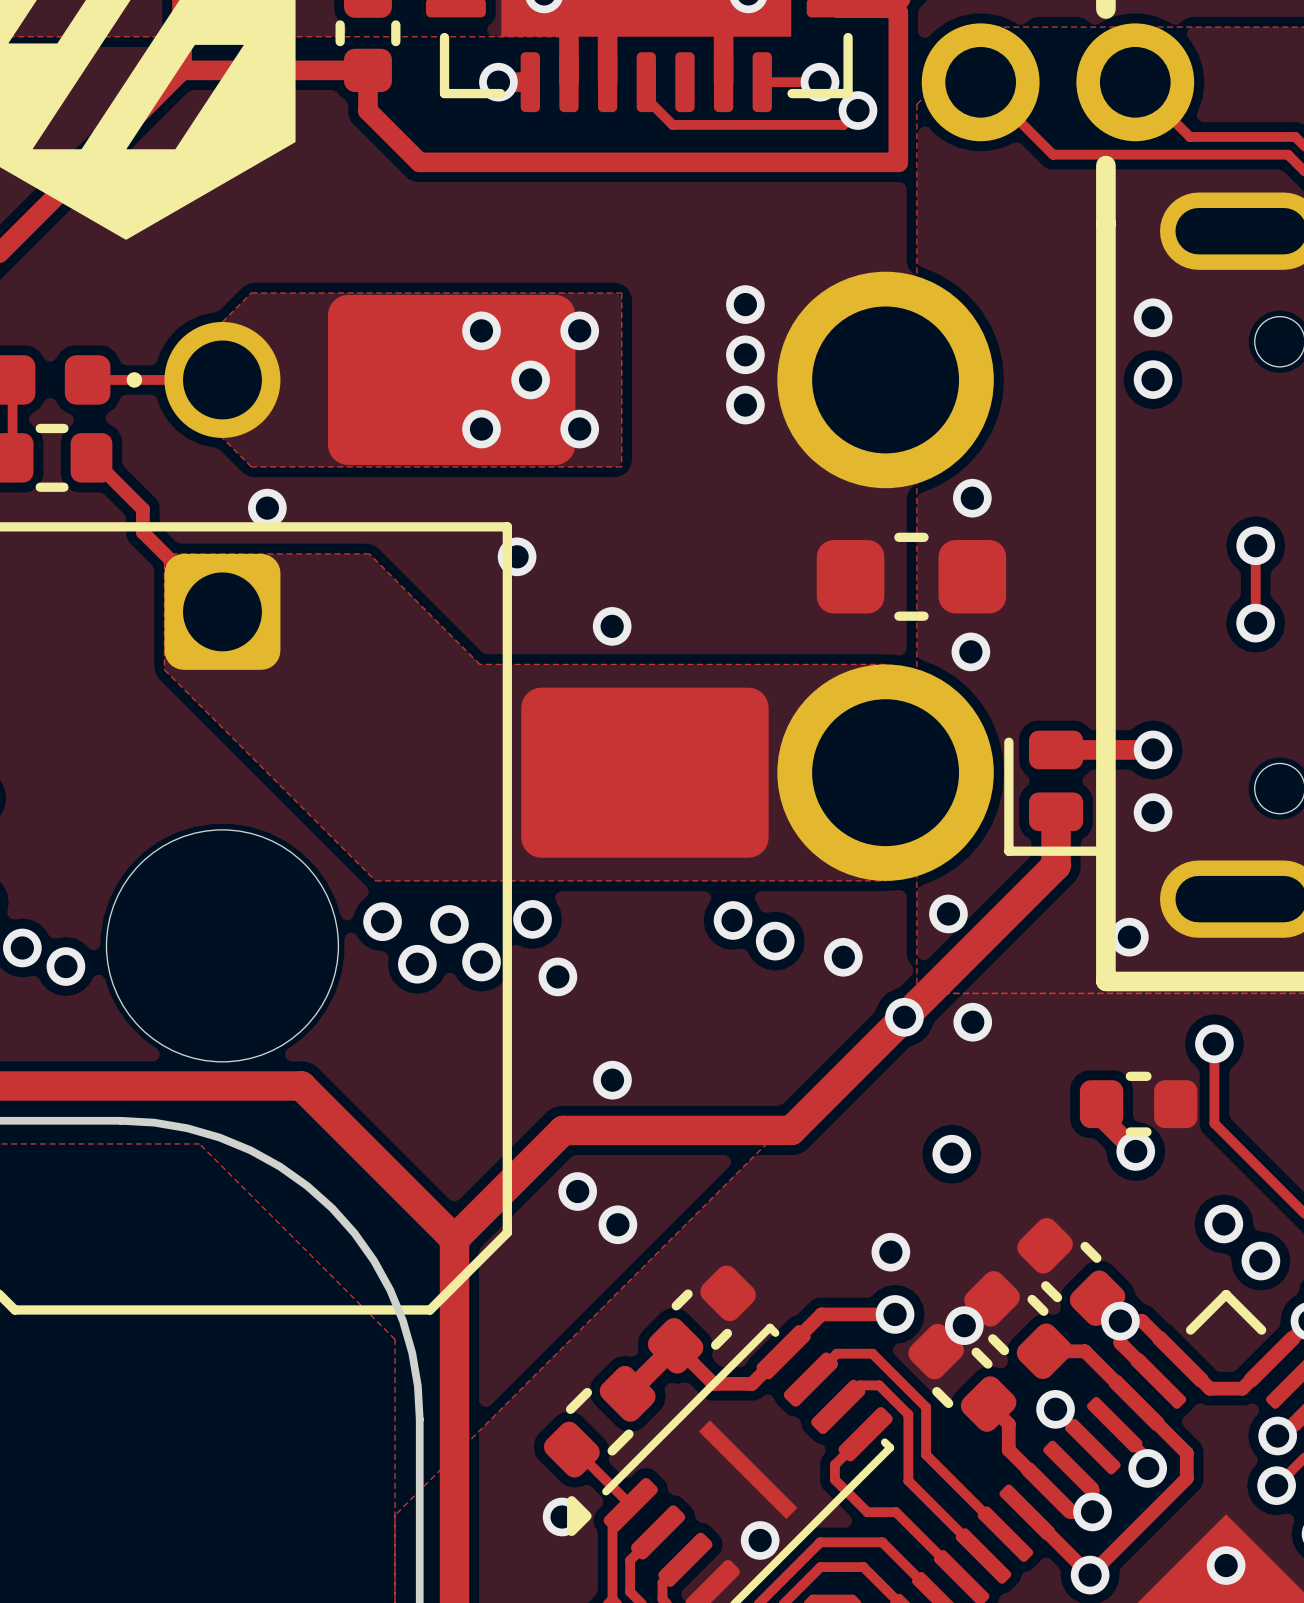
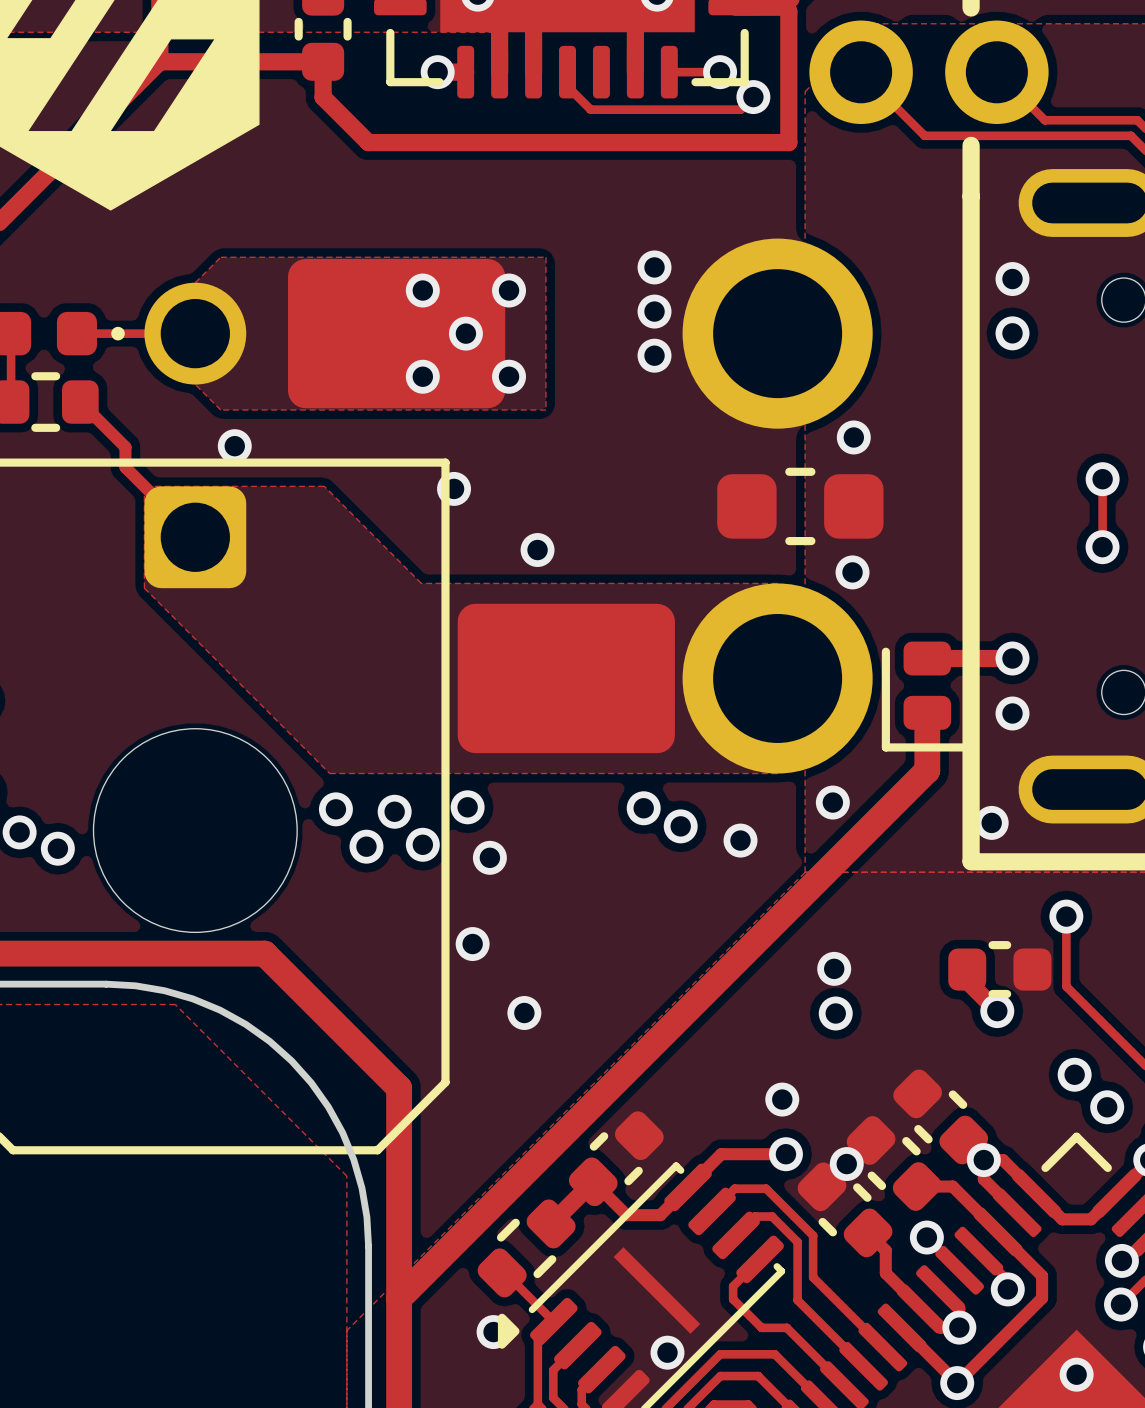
track: (1056, 865) (791, 1130) (563, 1130) (454, 1239) -> (927, 760) (927, 770) (399, 1298)
via: (904, 1017) -> none
via: (972, 1022) -> none
via: none -> (472, 944)
via: (612, 1080) -> none
via: none -> (834, 968)
via position: (577, 1191) -> (524, 1013)
via: (617, 1224) -> none

